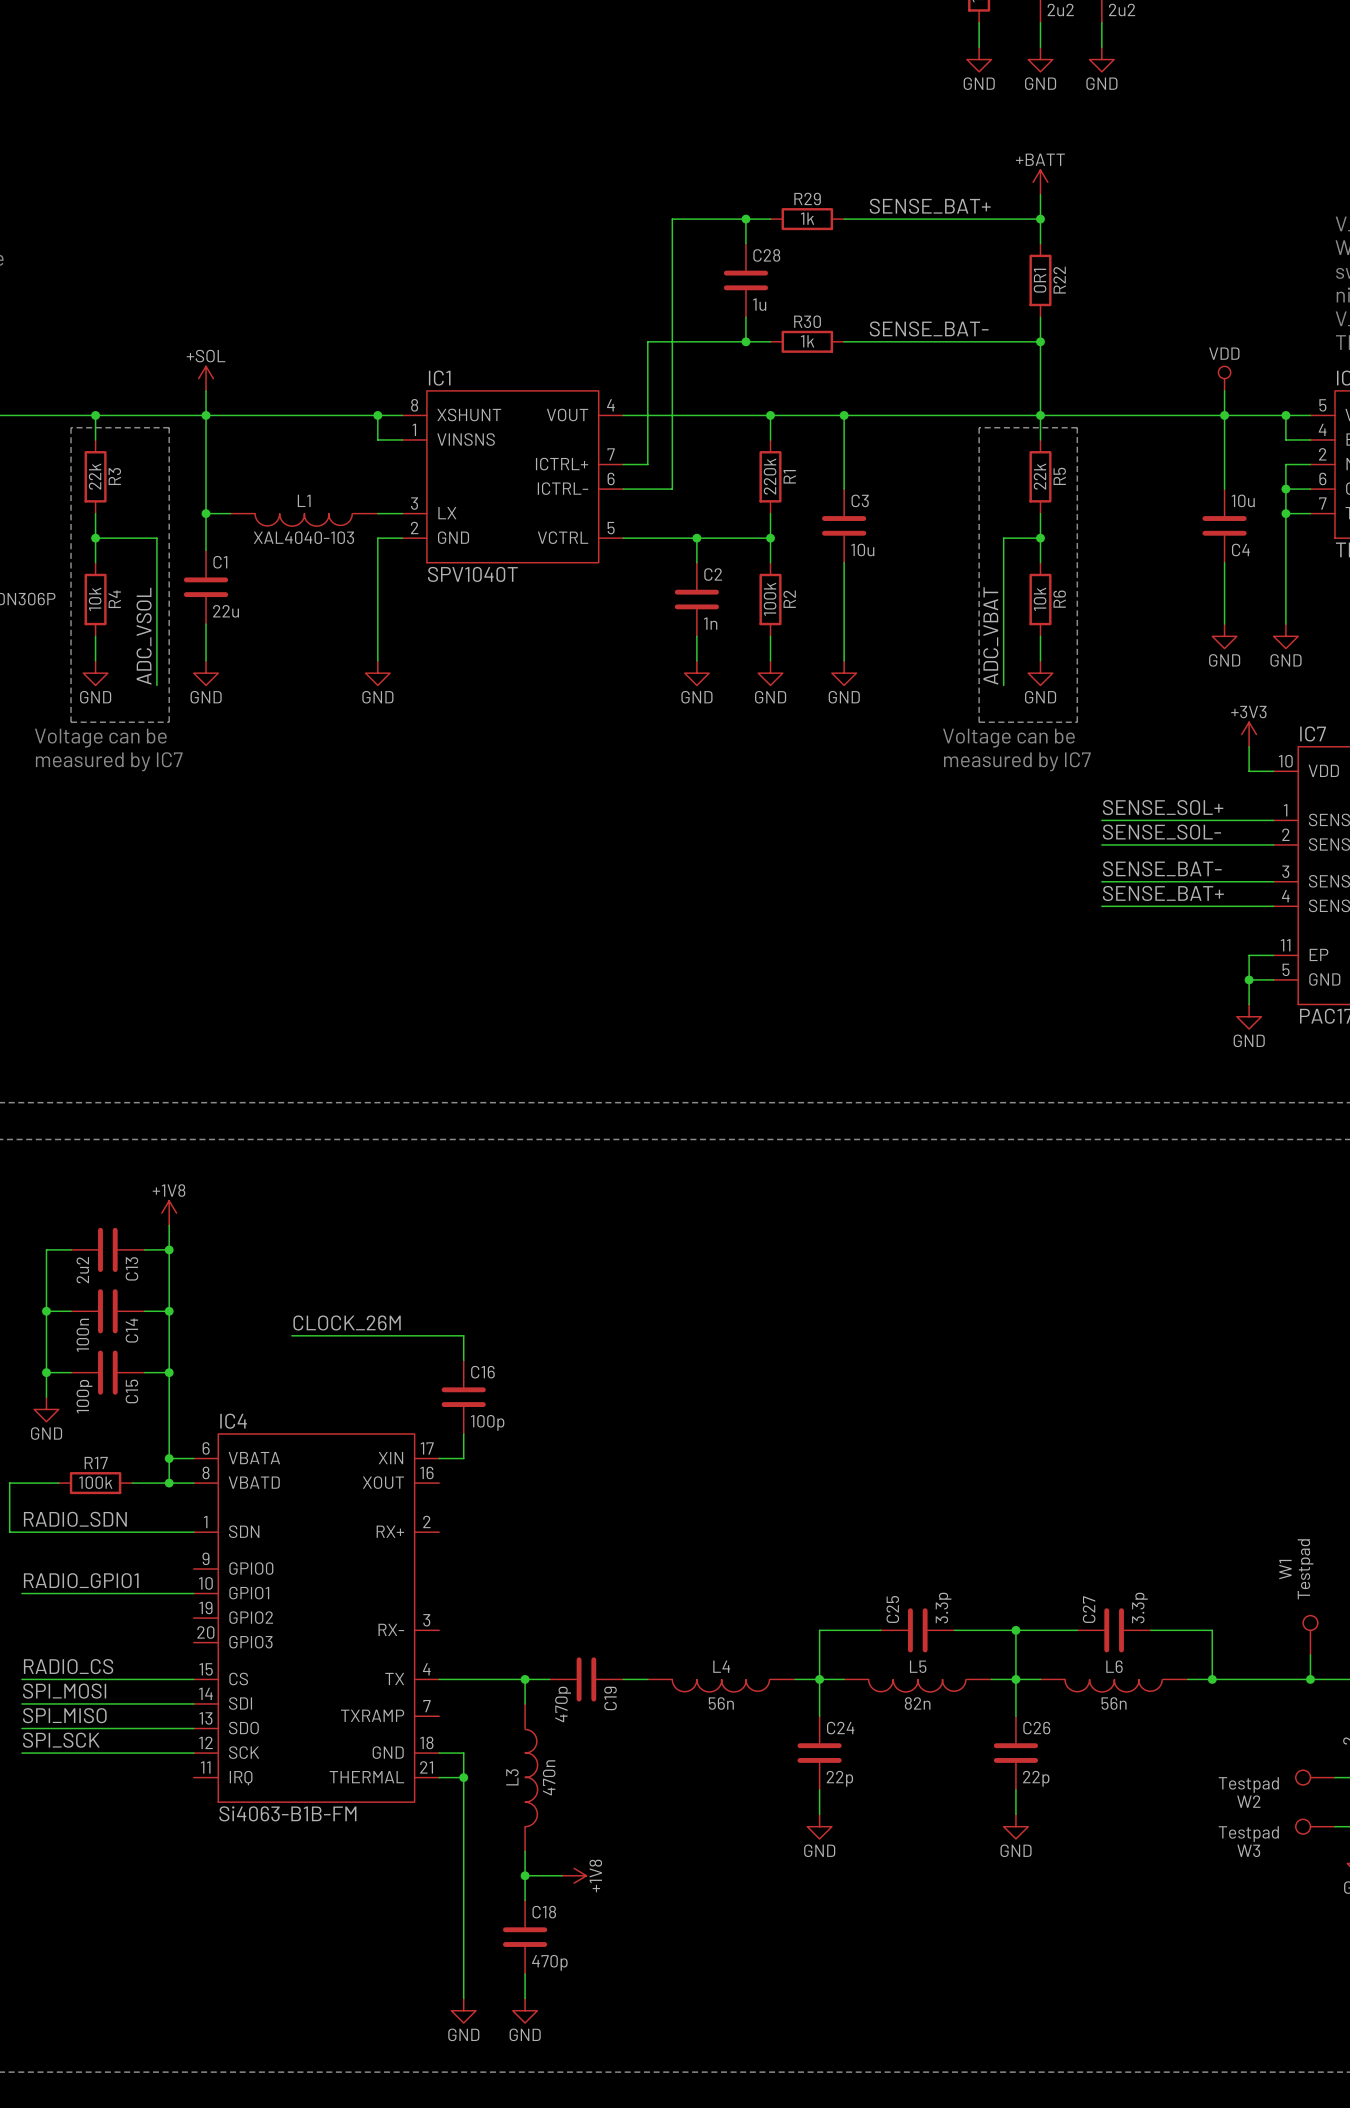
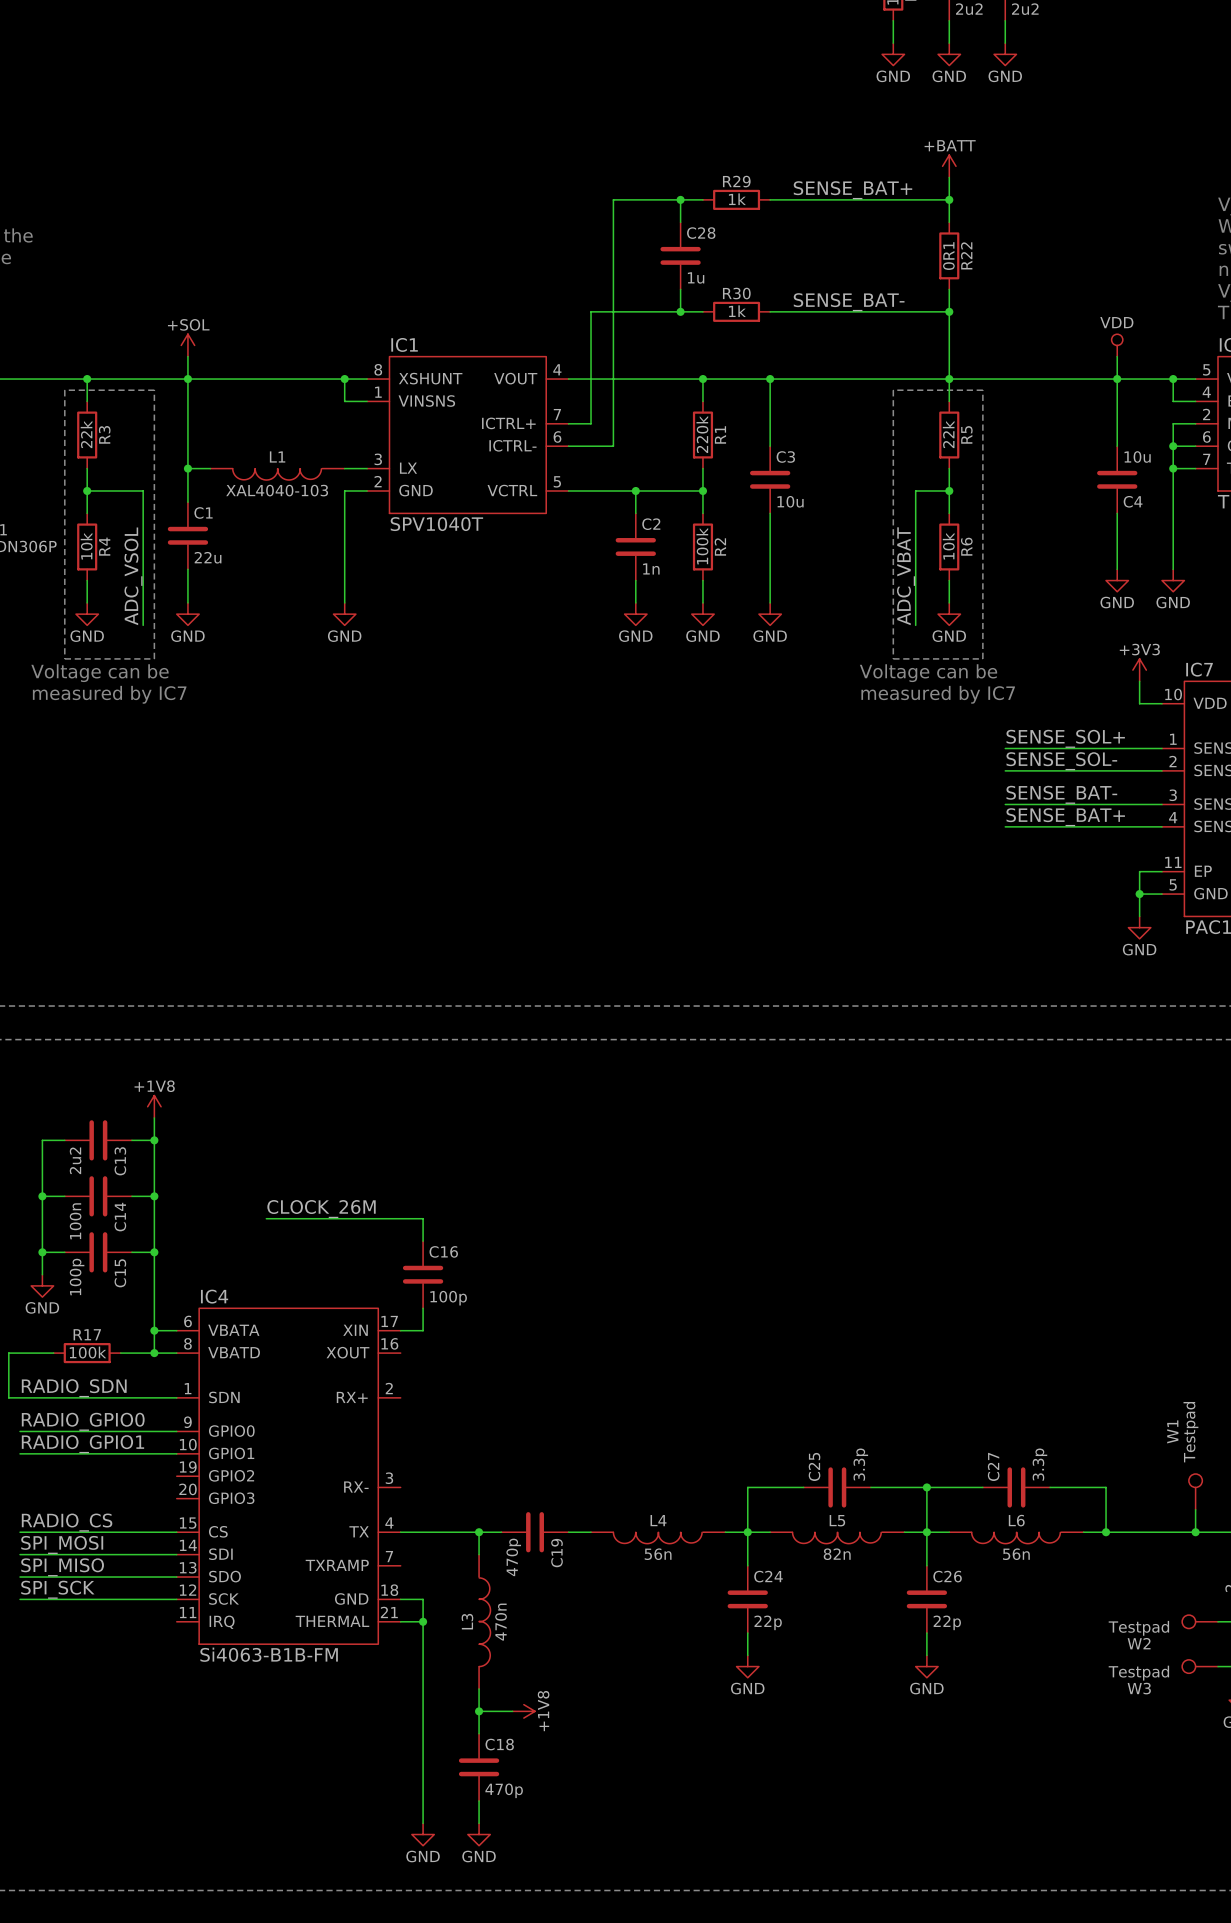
label: none -> RADIO_GPIO0 (83, 1421)
wire: none -> (20, 1431) (176, 1431)

